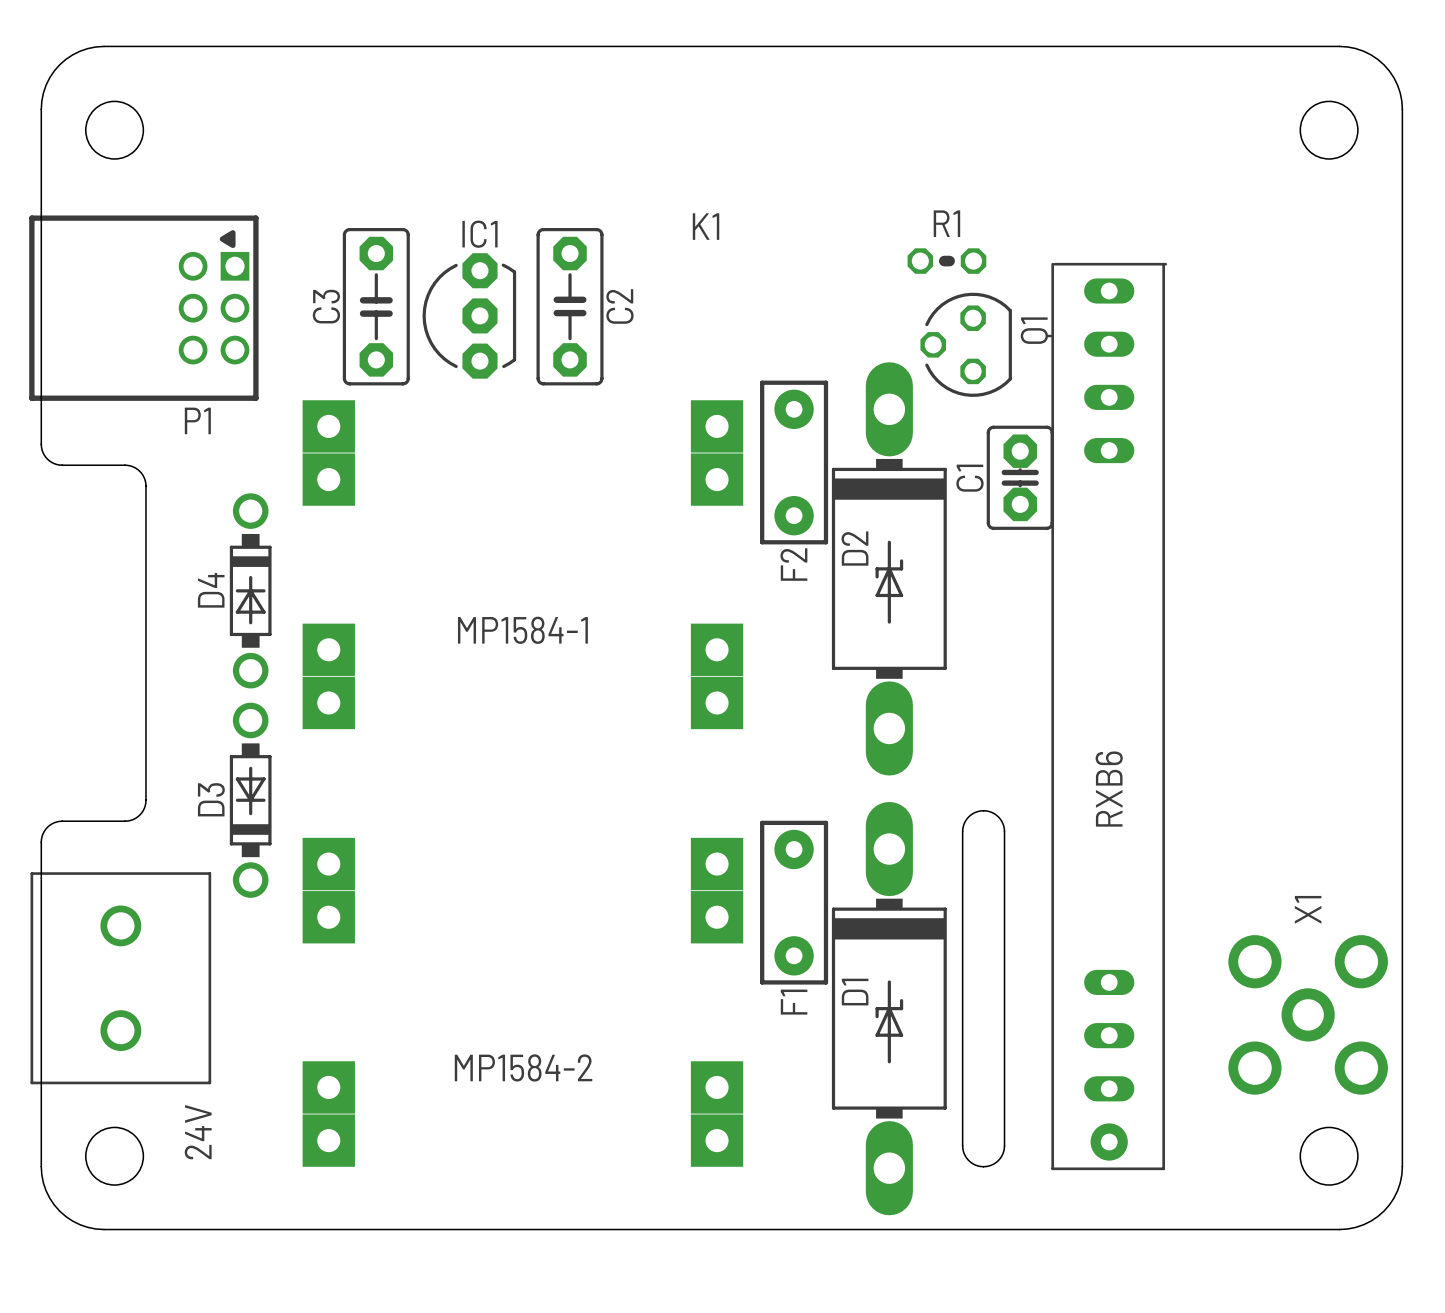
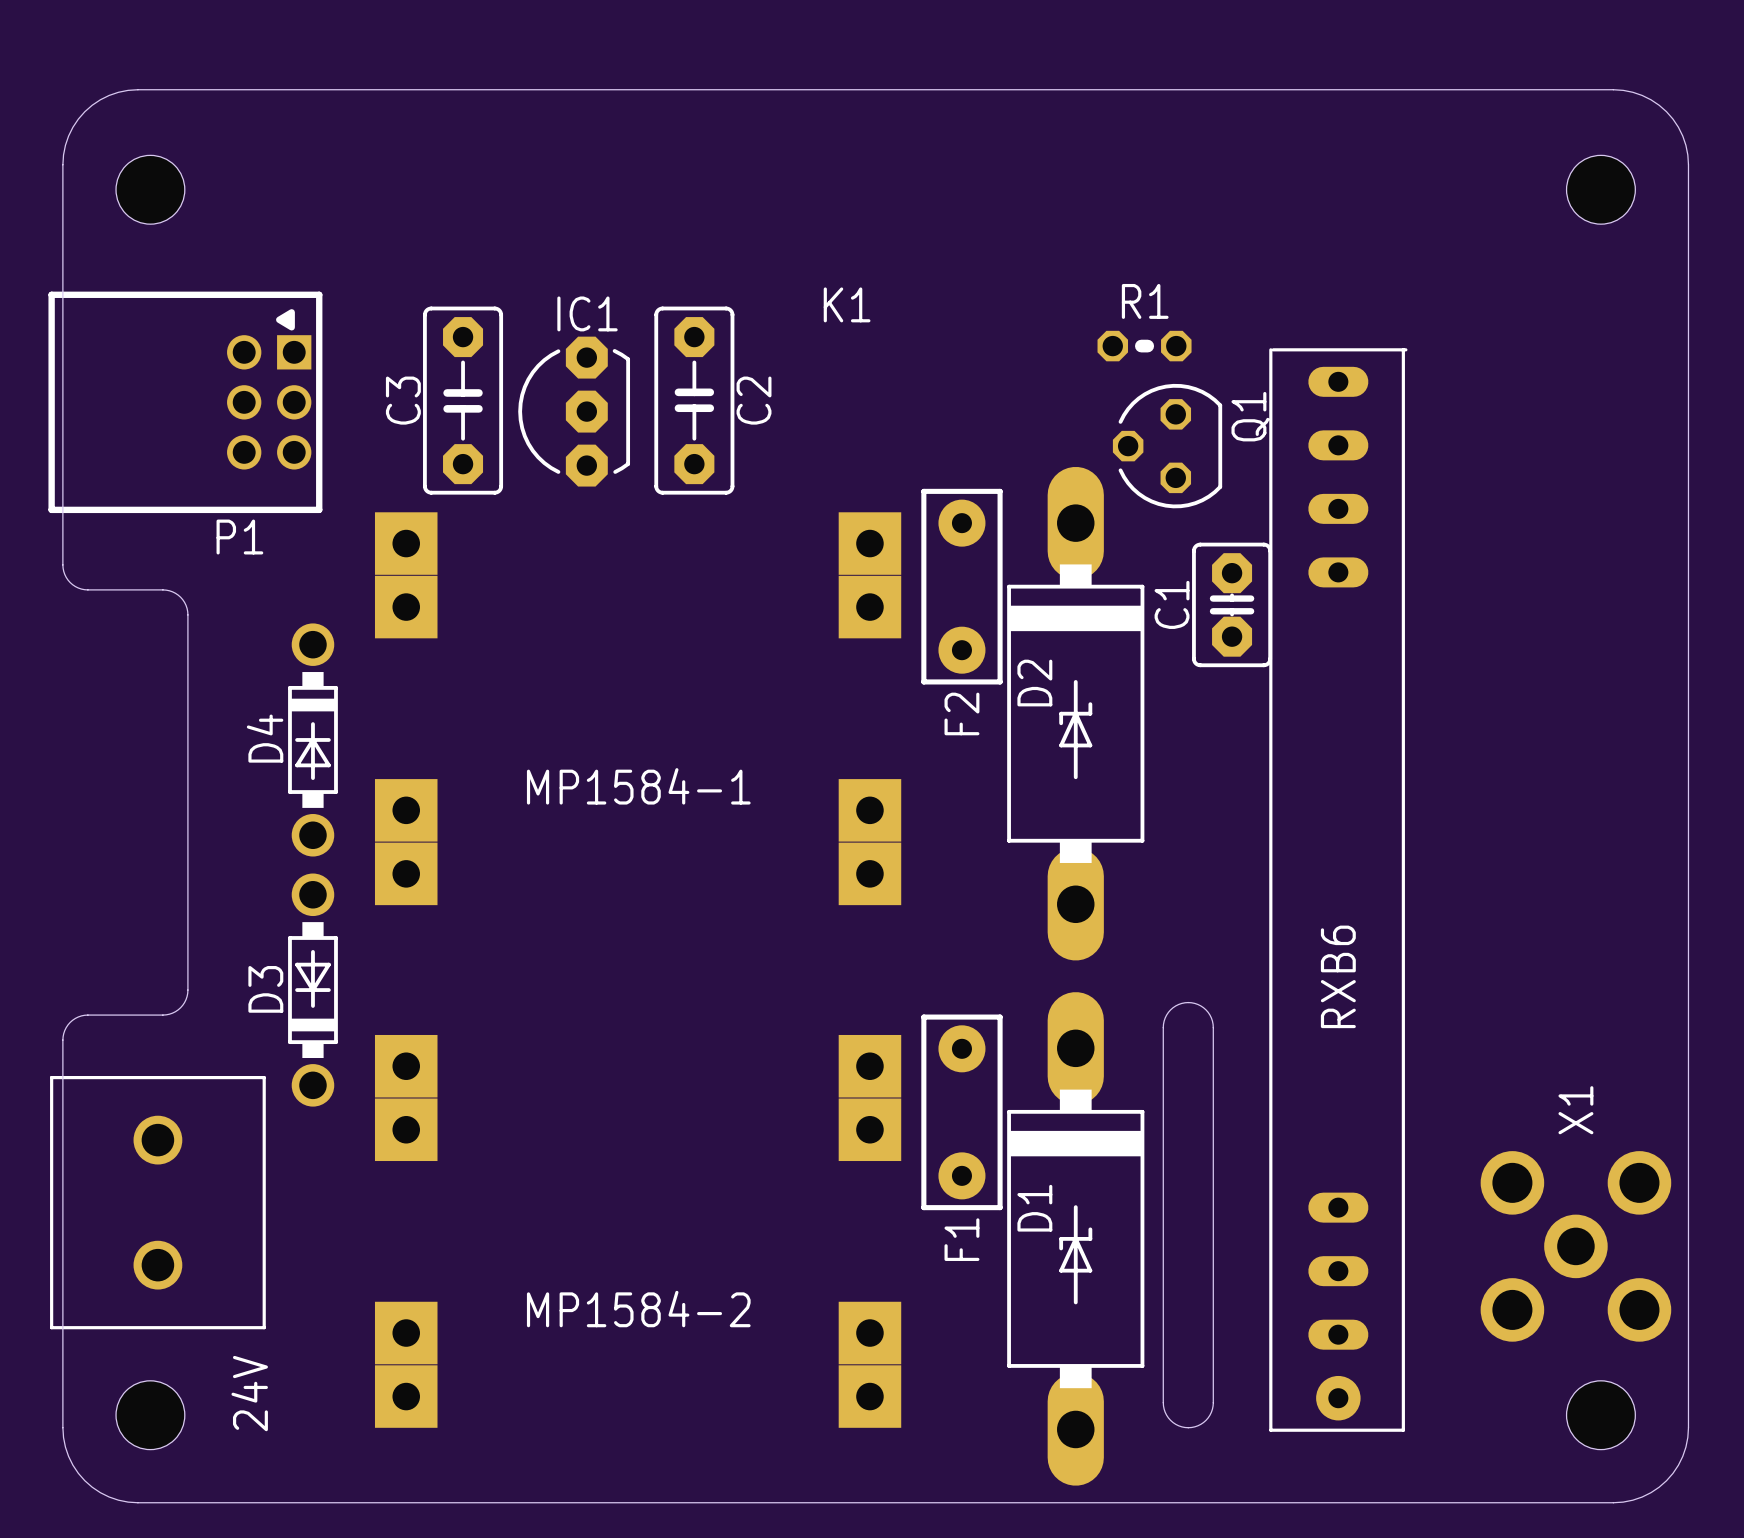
D2 footprint: [831, 362, 947, 776] -> [1007, 466, 1145, 961]
D1 footprint: [831, 801, 947, 1216] -> [1007, 992, 1145, 1486]

